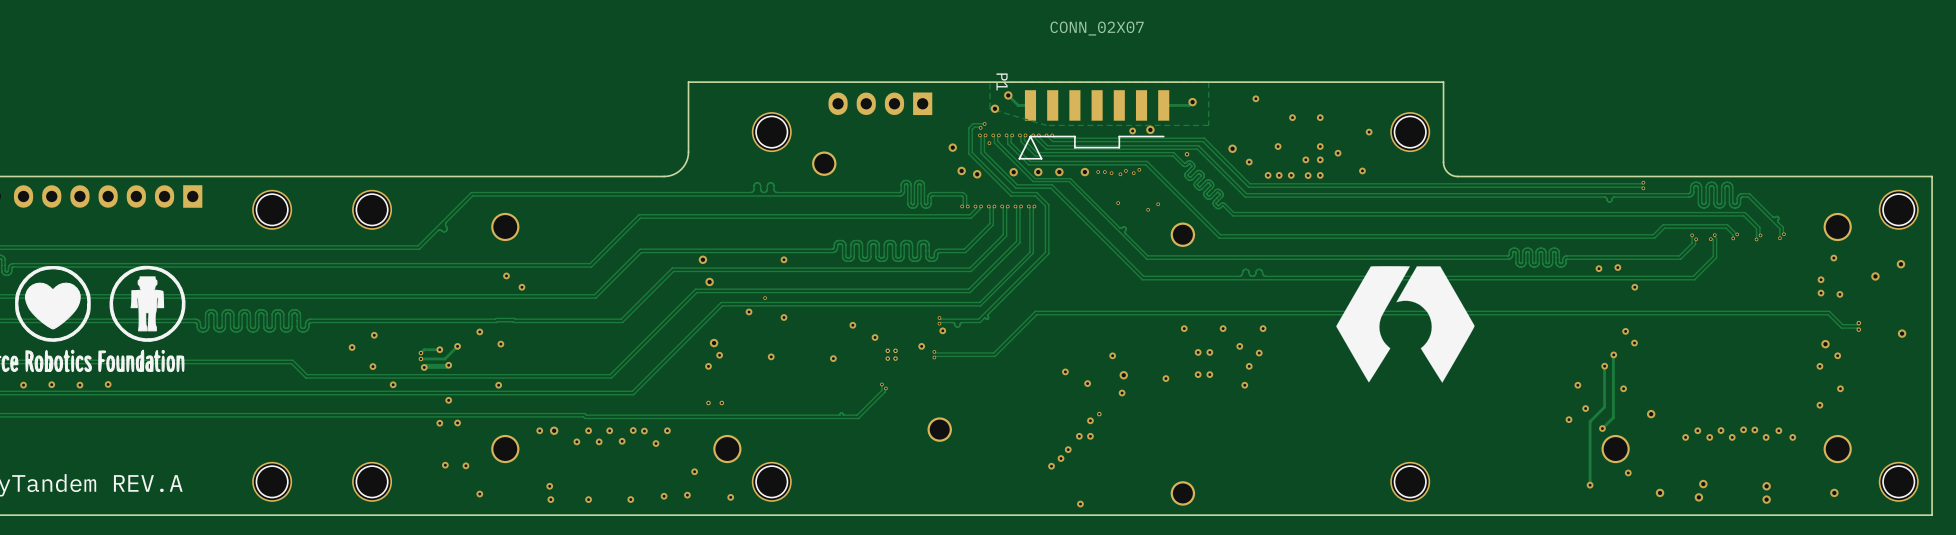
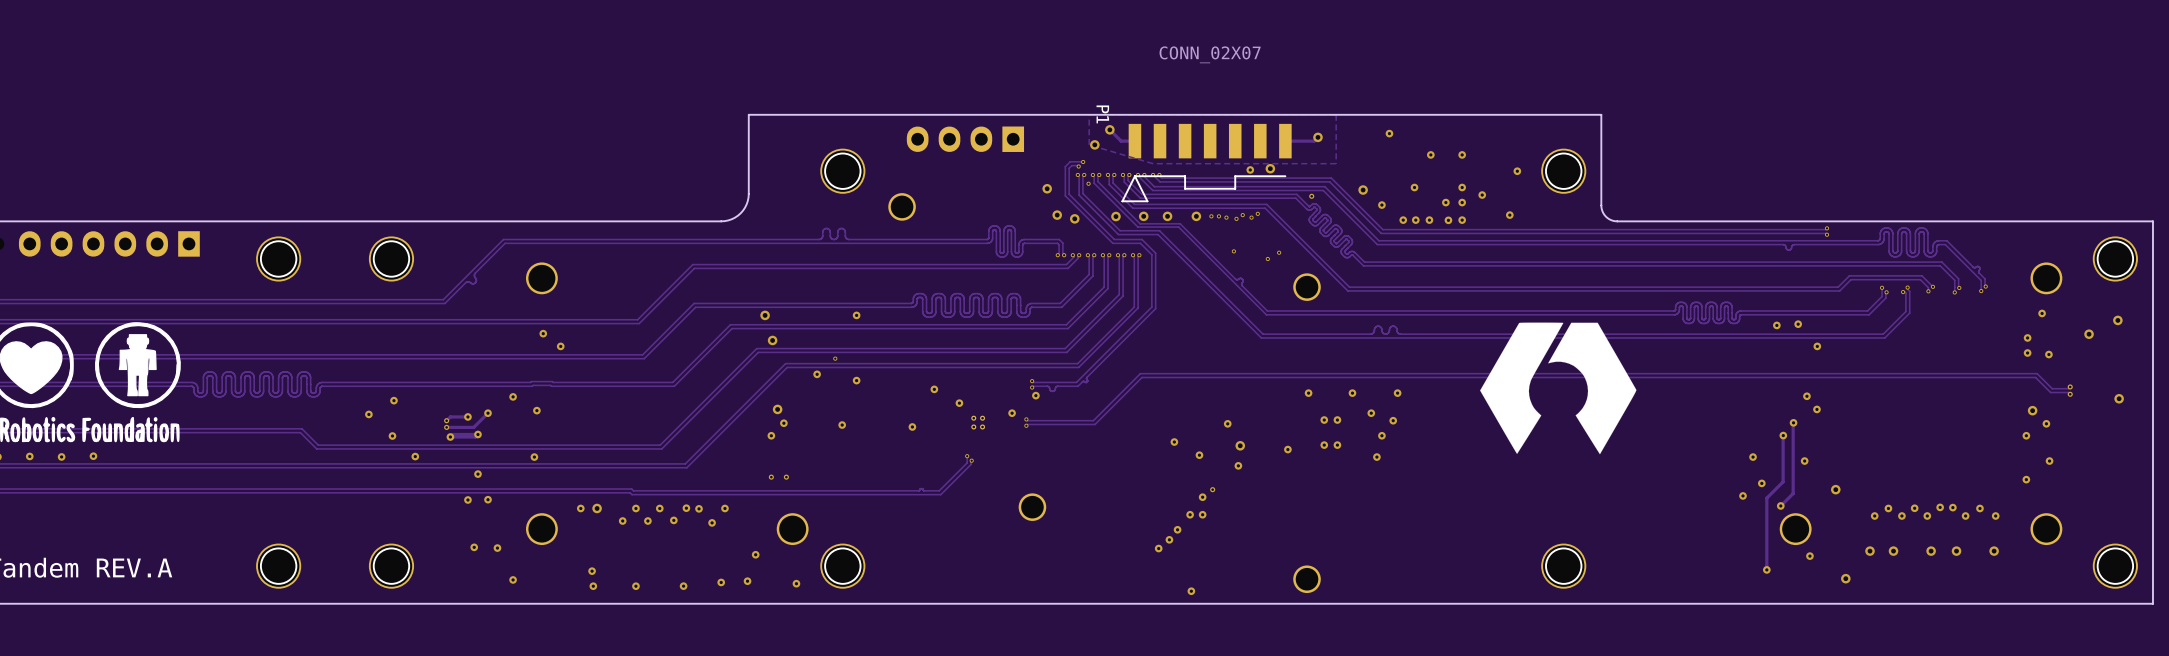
via: none -> (1870, 551)
via: none -> (1893, 551)
via: none -> (1931, 551)
via: none -> (1956, 551)
via: none -> (1994, 551)
via: (1703, 484) -> none
via: (1766, 486) -> none
via: (1834, 492) -> none
via: (1698, 497) -> none
via: (1766, 499) -> none

